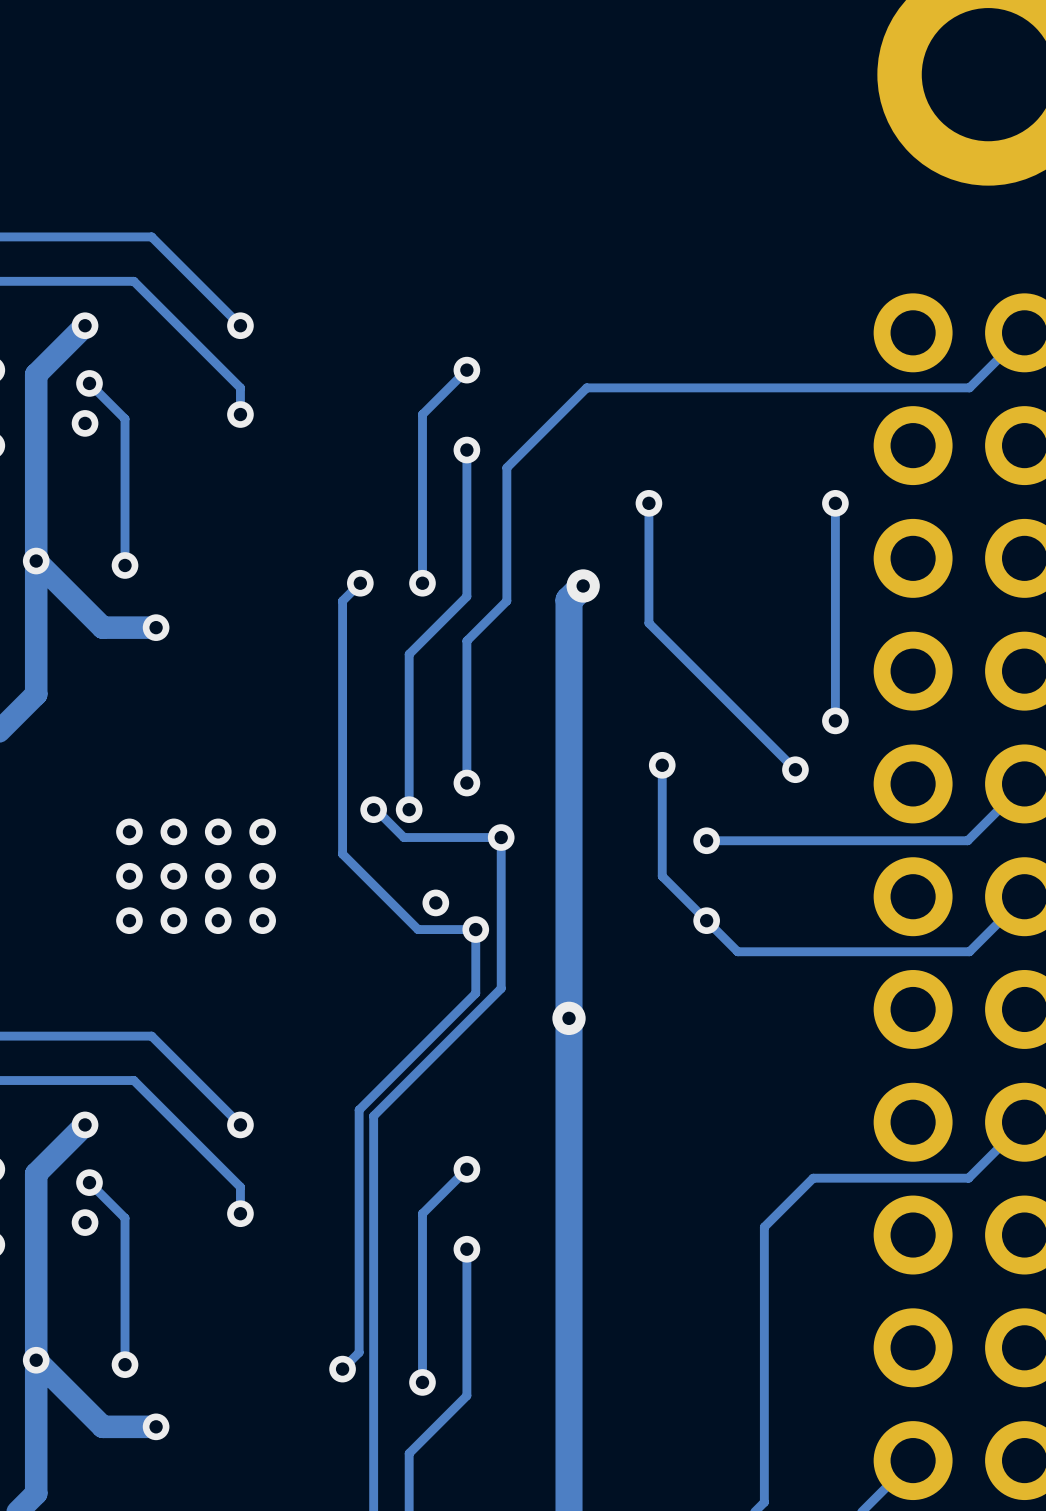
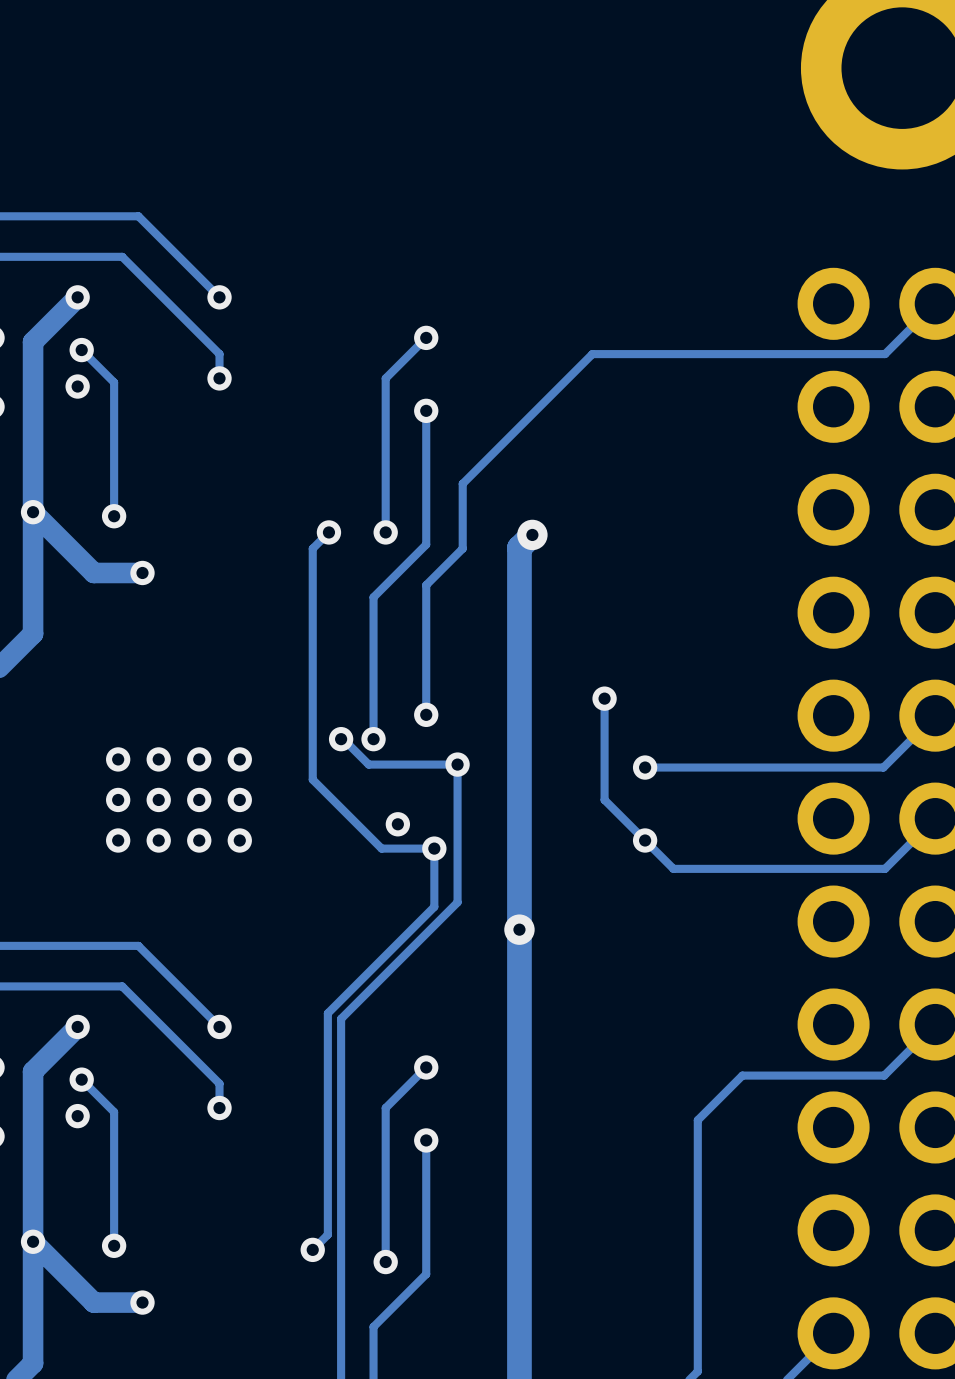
track: (648, 387) (586, 387) (506, 467) (506, 529) -> (592, 354) (462, 483)
track: (648, 503) (648, 623) (795, 769) -> none
via: (648, 503) -> none
track: (835, 503) (835, 720) -> none
via: (835, 503) -> none
via: (835, 720) -> none
via: (795, 769) -> none

